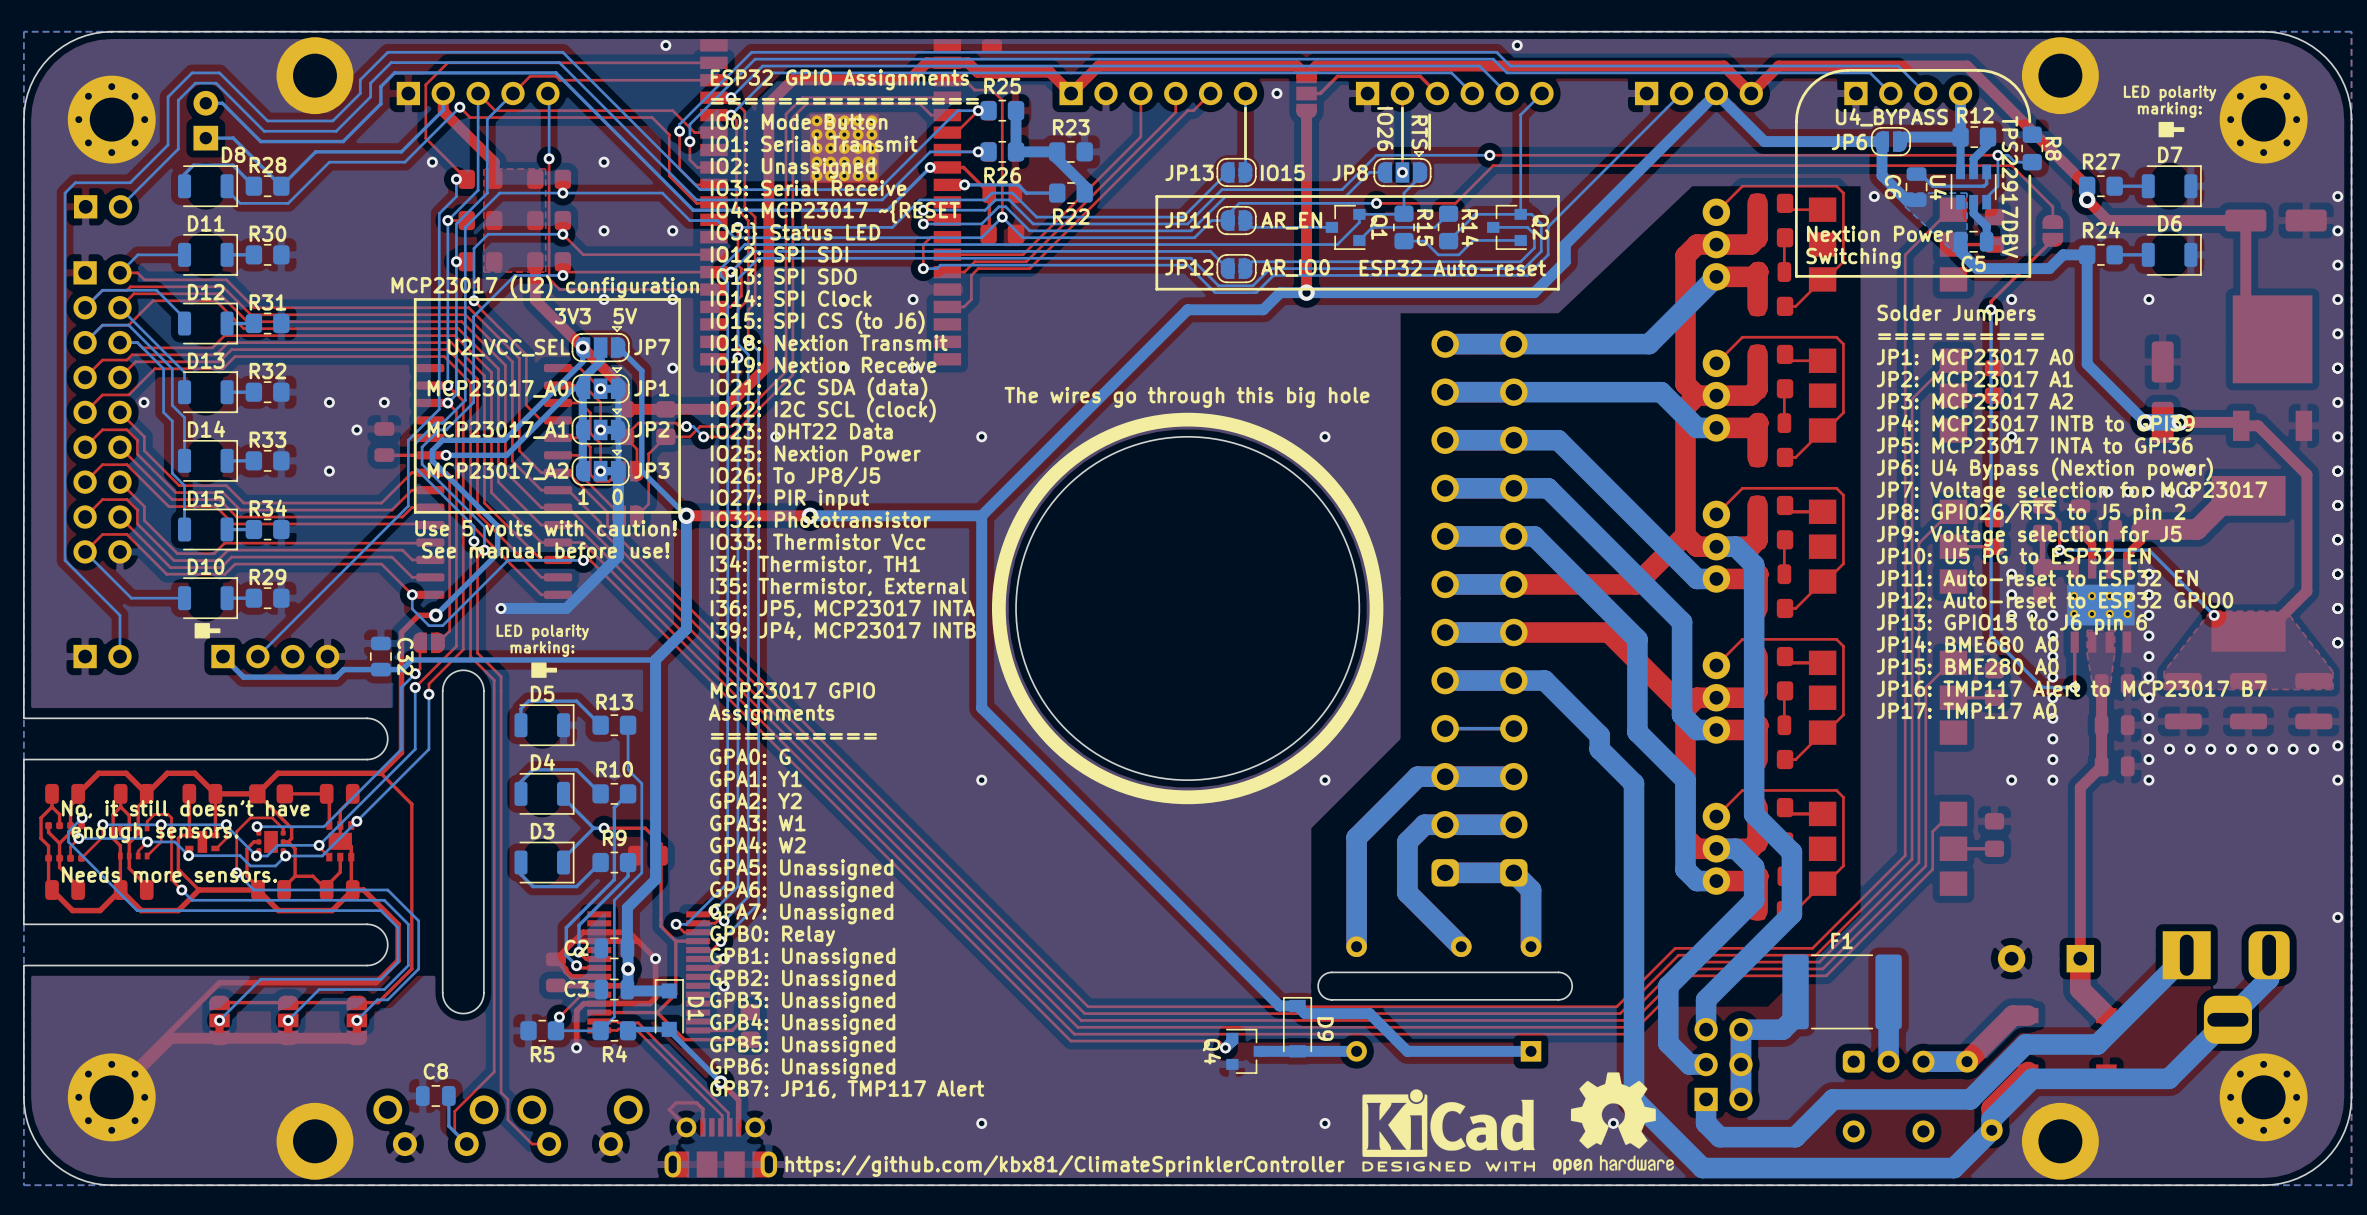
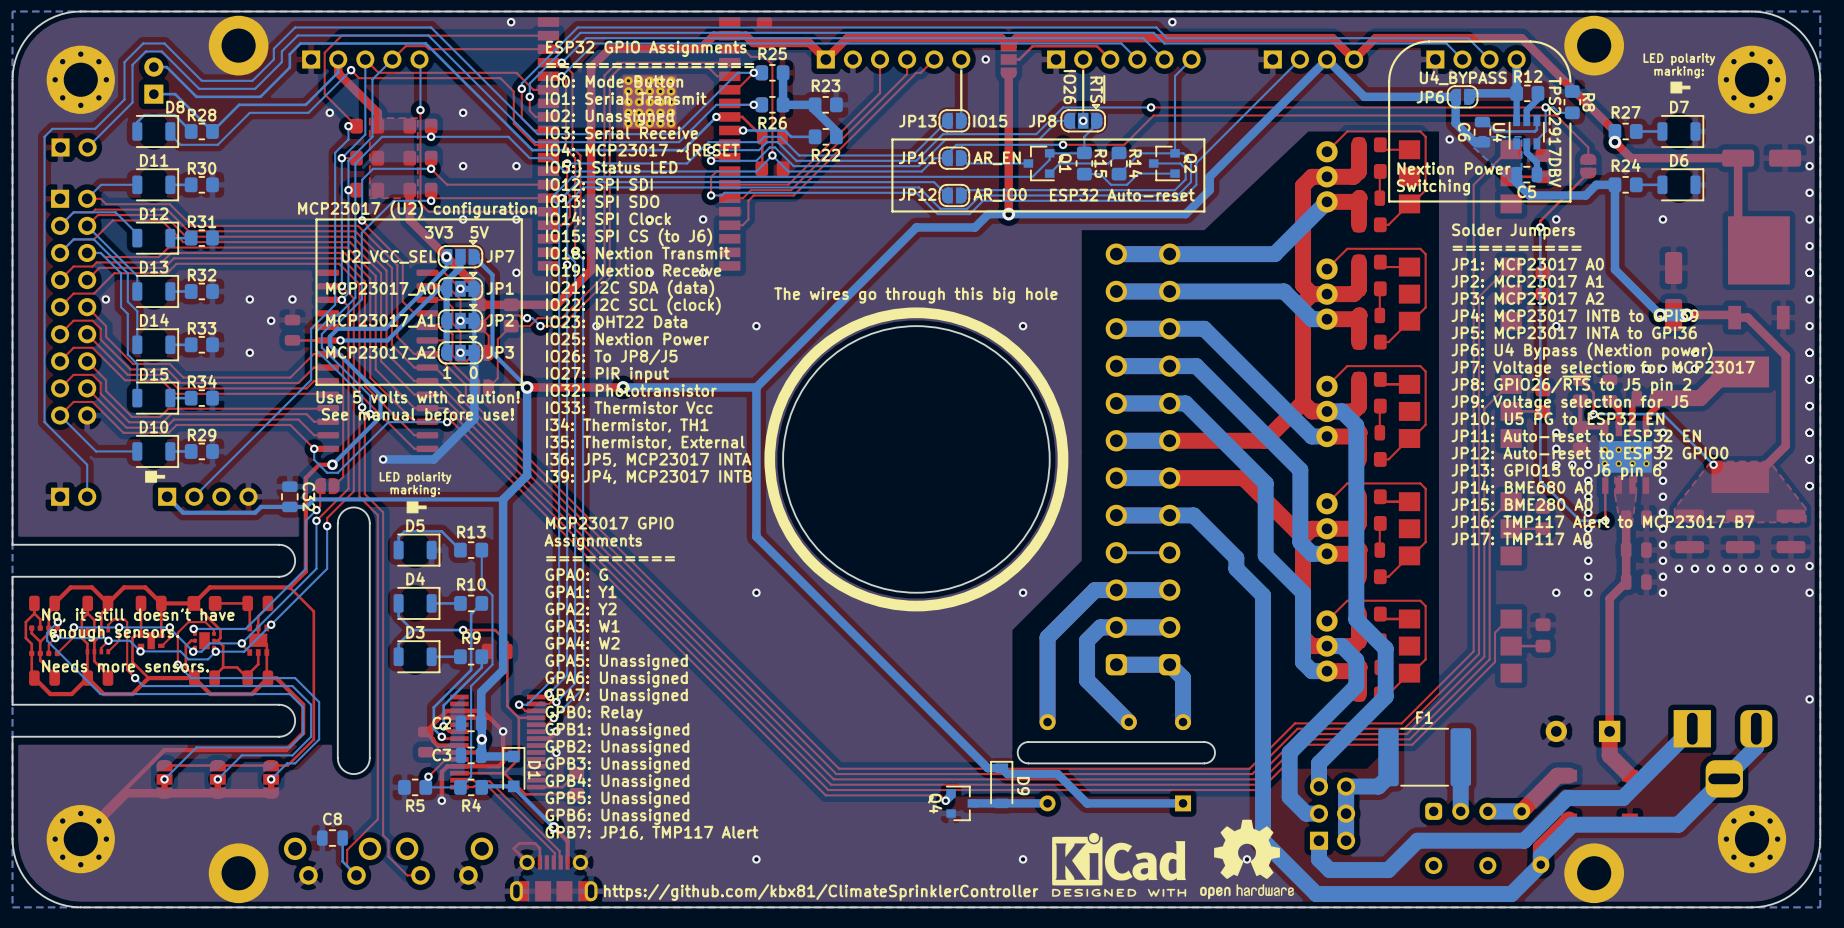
bottom track: none -> (398, 603) (398, 616) (412, 630)
bottom track: (563, 793) (563, 797) (593, 828) (563, 858) (563, 862) -> none
bottom track: (600, 793) (576, 769) (532, 769) (520, 781) (520, 793) -> (460, 603) (431, 603)
bottom track: none -> (412, 630) (398, 643) (398, 656)
bottom track: none -> (455, 630) (412, 630)
bottom track: (600, 862) (576, 886) (532, 886) (520, 874) (520, 862) -> (460, 656) (431, 656)

